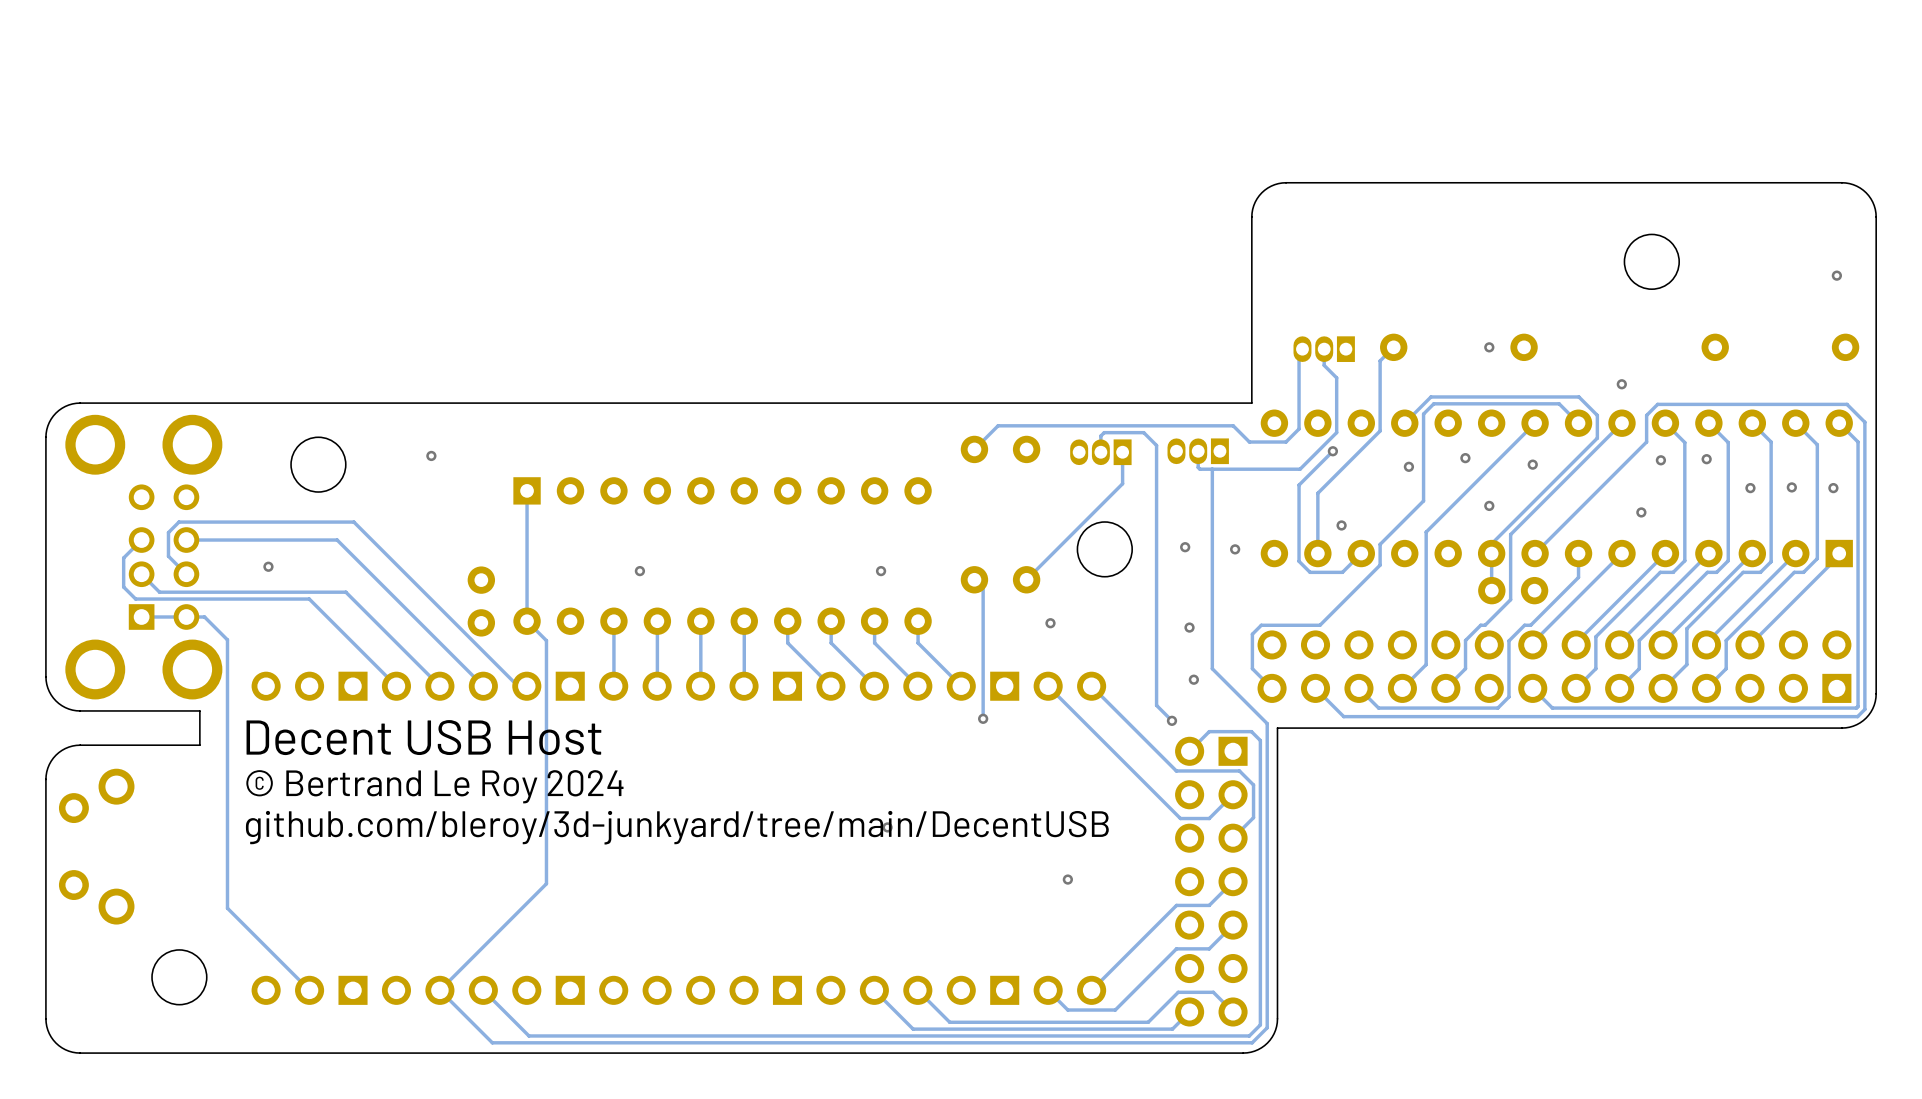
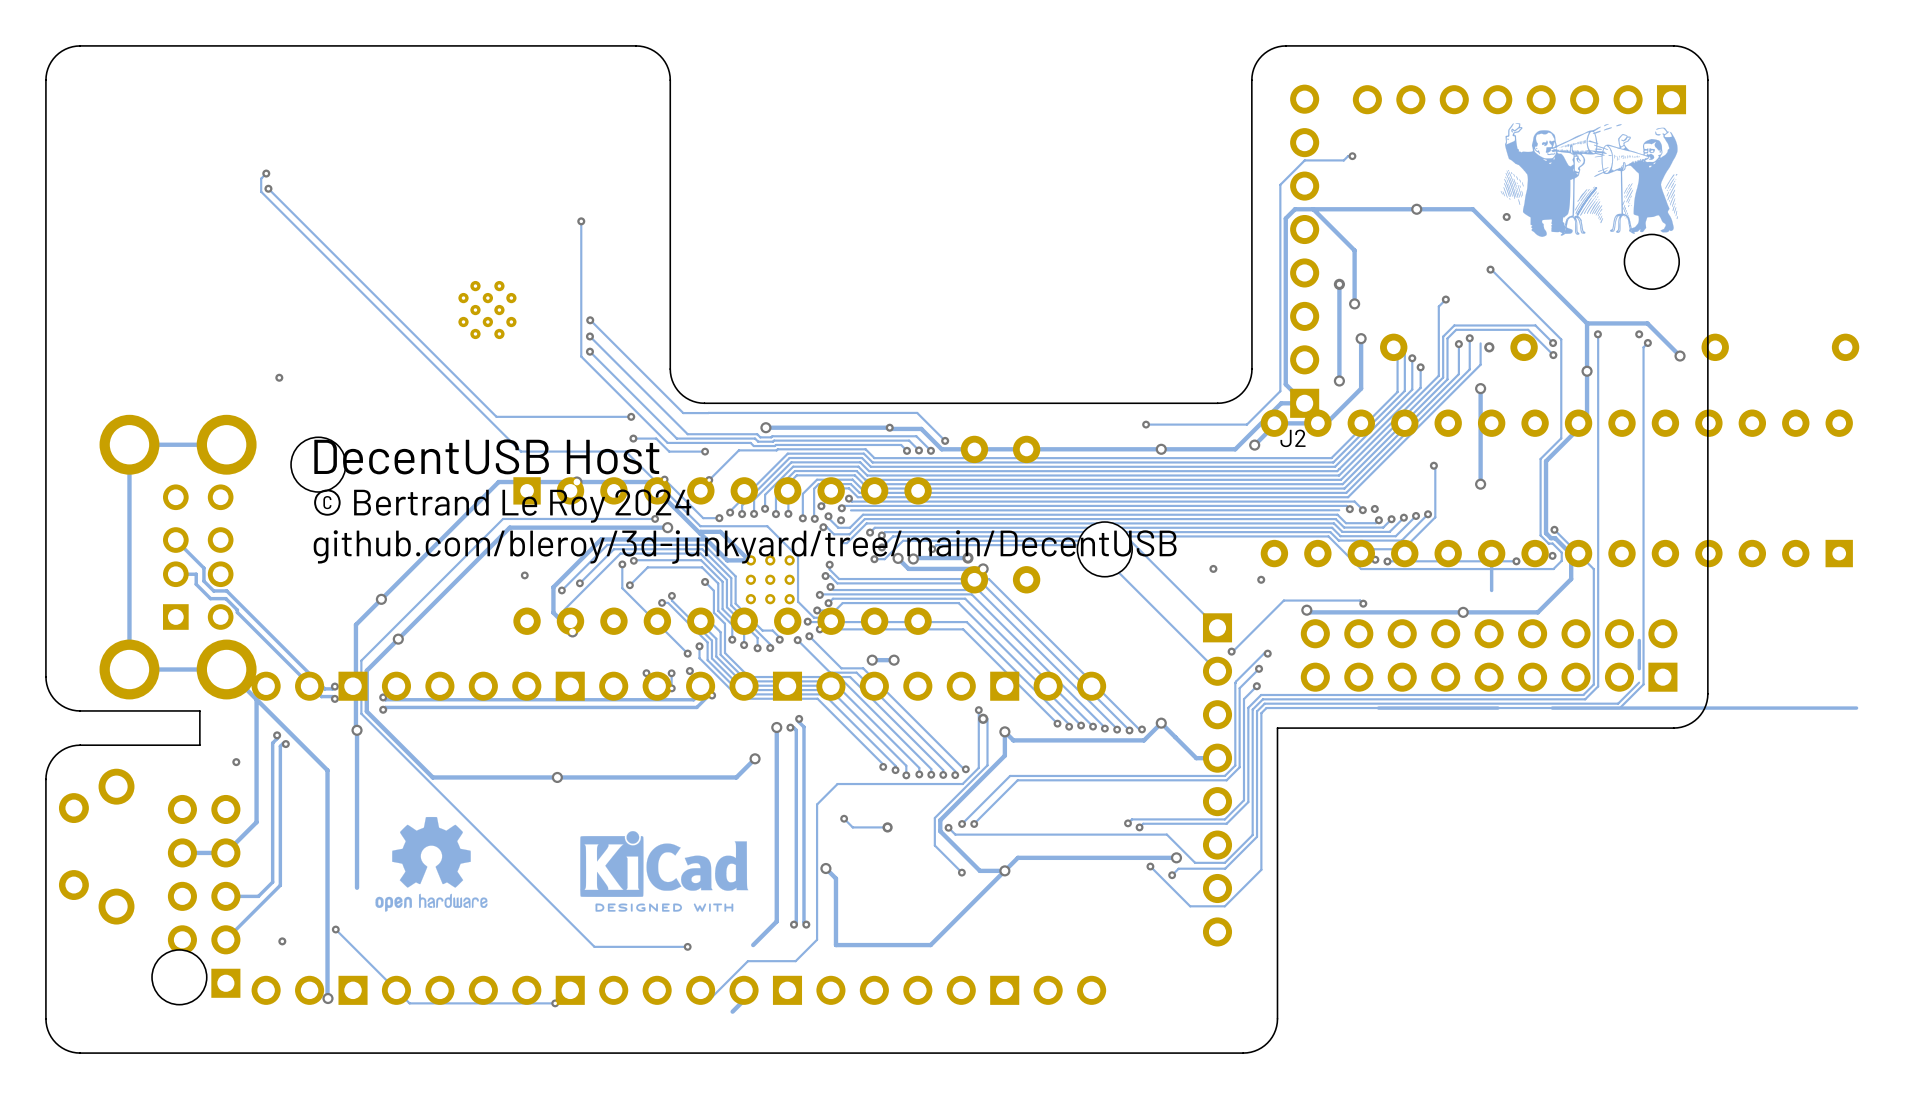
part: none -> (1519, 99)
drawing: none -> [1500, 123, 1678, 237]
track: none -> (1352, 156) (1348, 156) (1343, 160) (1304, 160) (1280, 184) (1280, 391) (1246, 424) (1146, 424)
via: none -> (1352, 156)
track: none -> (266, 173) (261, 178) (261, 191) (520, 451) (625, 451) (700, 526) (767, 526) (798, 556) (798, 601) (814, 617) (838, 617) (841, 614)
via: none -> (266, 173)
track: none -> (268, 188) (496, 416) (631, 416)
via: none -> (268, 188)
track: none -> (1313, 209) (1354, 250) (1354, 303)
via: none -> (1416, 209)
via: none -> (1506, 217)
track: none -> (581, 221) (581, 356) (667, 442) (750, 442) (753, 446) (901, 444) (906, 450)
via: none -> (581, 221)
J2: none -> (1304, 251)
track: none -> (1490, 269) (1561, 339) (1561, 438) (1540, 458) (1540, 535) (1561, 552) (1561, 560) (1553, 569) (1361, 569) (1328, 536) (893, 536) (882, 547)
via: none -> (1490, 269)
via: (1836, 275) -> none
track: none -> (1339, 284) (1339, 381)
via: none -> (1339, 284)
track: none -> (1445, 299) (1438, 306) (1438, 375) (1339, 475) (867, 475) (858, 466) (793, 466) (765, 494) (765, 508)
via: none -> (1445, 299)
via: none -> (1354, 303)
part: none -> (487, 310)
track: none -> (590, 320) (683, 413) (917, 412) (945, 440)
via: none -> (590, 320)
track: none -> (1587, 323) (1587, 420) (1546, 461) (1546, 533) (1551, 538) (1555, 538) (1571, 554) (1571, 579) (1537, 612) (1309, 612) (1306, 610)
track: none -> (1587, 323) (1647, 323) (1680, 356)
track: none -> (1587, 323) (1472, 209) (1295, 209) (1285, 218) (1285, 384) (1304, 403) (1281, 403) (1235, 449) (941, 449) (921, 428) (765, 427)
track: none -> (1597, 334) (1598, 686) (1585, 699) (1262, 699) (1252, 709) (1252, 835) (1224, 862) (1195, 862) (1166, 834) (955, 834) (948, 827)
via: none -> (1597, 334)
via: none -> (1639, 334)
track: none -> (589, 336) (687, 434) (757, 434) (760, 437) (916, 436) (930, 450)
via: none -> (589, 336)
track: none -> (1397, 337) (1397, 392) (1331, 458) (874, 458) (865, 449) (738, 450) (709, 480)
track: none -> (1361, 338) (1361, 388) (1326, 423) (1276, 423) (1254, 445)
via: none -> (1361, 338)
track: none -> (1469, 338) (1469, 369) (1346, 492) (859, 492) (850, 484) (818, 484) (814, 488) (814, 518)
via: none -> (1469, 338)
track: none -> (1647, 342) (1643, 347) (1643, 684) (1619, 708) (1266, 708) (1261, 713) (1261, 869) (1224, 906) (1190, 906) (1150, 866)
via: none -> (1647, 342)
track: none -> (1480, 343) (1480, 364) (1348, 497) (857, 497) (849, 488) (839, 488) (821, 506)
track: none -> (1553, 343) (1535, 325) (1454, 325) (1443, 336) (1443, 377) (1340, 479) (865, 479) (856, 471) (795, 471) (775, 490) (775, 514)
via: none -> (1553, 343)
track: none -> (1458, 344) (1458, 374) (1344, 488) (861, 488) (852, 479) (817, 479) (802, 493) (802, 518)
via: none -> (1458, 344)
track: (1393, 347) (1380, 360) (1380, 430) (1317, 493) (1317, 553) -> none
track: none -> (1404, 348) (1404, 390) (1333, 462) (872, 462) (863, 453) (787, 453) (730, 512)
track: (1324, 349) (1324, 365) (1336, 377) (1336, 432) (1300, 469) (1199, 469) (1198, 467) (1198, 451) -> none
part: (1324, 349) -> none
track: none -> (589, 351) (676, 438) (755, 438) (758, 441) (909, 440) (918, 450)
via: none -> (589, 351)
track: (1299, 352) (1299, 428) (1286, 442) (1249, 442) (1233, 425) (998, 425) (974, 449) -> none
track: none -> (1553, 355) (1528, 329) (1456, 329) (1447, 338) (1447, 379) (1342, 484) (863, 484) (854, 475) (796, 475) (788, 483) (788, 513)
via: none -> (1553, 355)
via: none -> (1680, 356)
track: none -> (1412, 358) (1412, 389) (1335, 466) (870, 466) (862, 458) (789, 458) (742, 505) (742, 514)
via: none -> (1412, 358)
track: none -> (1420, 367) (1420, 387) (1337, 471) (869, 471) (860, 462) (791, 462) (754, 499) (754, 513)
via: none -> (1420, 367)
via: none -> (1587, 371)
via: none -> (279, 377)
via: none -> (1339, 381)
via: (1621, 384) -> none
track: none -> (1480, 388) (1480, 484)
via: none -> (1480, 388)
via: none -> (631, 416)
track: (1404, 423) (1430, 396) (1578, 396) (1597, 415) (1597, 438) (1491, 543) -> none
track: (1535, 423) (1426, 532) (1426, 664) (1402, 688) -> none
track: (1578, 423) (1559, 403) (1433, 403) (1423, 414) (1423, 500) (1380, 544) (1380, 565) (1319, 625) (1261, 625) (1252, 634) (1252, 668) (1272, 688) -> none
track: (1621, 423) (1510, 534) (1510, 599) (1485, 625) (1480, 625) (1465, 640) (1465, 668) (1445, 688) -> none
track: (1665, 423) (1684, 442) (1684, 560) (1673, 572) (1660, 572) (1595, 636) (1595, 668) (1576, 688) -> none
track: (1708, 423) (1728, 442) (1728, 560) (1716, 572) (1707, 572) (1639, 640) -> none
track: (1752, 423) (1771, 442) (1771, 561) (1760, 572) (1743, 572) (1686, 628) (1686, 664) (1663, 688) -> none
track: (1795, 423) (1817, 444) (1817, 558) (1803, 572) (1794, 572) (1726, 640) (1726, 668) (1706, 688) -> none
track: (1839, 423) (1858, 442) (1856, 708) -> none
via: none -> (1146, 424)
via: none -> (765, 427)
via: none -> (889, 427)
board edge: (45, 437) (47, 425) (55, 413) (68, 405) (80, 403) (1251, 403) (1252, 213) (1259, 195) (1274, 184) (1286, 182) (1841, 182) (1853, 184) (1863, 190) (1870, 198) (1876, 216) (1876, 693) (1874, 705) (1863, 720) (1845, 727) (1673, 728) -> (45, 437) (46, 76) (53, 58) (61, 51) (72, 46) (636, 45) (654, 51) (665, 61) (670, 80) (670, 372) (673, 383) (680, 393) (689, 399) (704, 403) (1217, 403) (1229, 401) (1244, 390) (1251, 372) (1251, 80) (1255, 65) (1264, 53) (1274, 47) (1286, 45) (1681, 46) (1691, 51) (1700, 58) (1705, 68) (1707, 80) (1707, 693) (1704, 708) (1697, 718) (1684, 726) (1673, 728)
track: none -> (633, 438) (656, 438) (669, 451) (705, 451)
via: none -> (633, 438)
via: none -> (945, 440)
track: none -> (226, 444) (129, 444) (129, 669) (226, 669) (327, 770) (327, 998)
via: none -> (1254, 445)
via: none -> (1161, 449)
via: none -> (906, 450)
via: none -> (918, 450)
via: none -> (930, 450)
via: none -> (705, 451)
part: (1198, 451) -> none
track: (1332, 451) (1299, 485) (1299, 561) (1310, 572) (1342, 572) (1361, 553) -> none
via: (1332, 451) -> none
track: (1100, 452) (1100, 435) (1104, 432) (1143, 432) (1156, 445) (1156, 705) (1171, 720) -> none
part: (1100, 452) -> none
track: (1122, 452) (1122, 483) (1026, 579) -> none
via: (431, 455) -> none
text: none -> DecentUSB Host (486, 456)
via: (1465, 458) -> none
via: (1706, 459) -> none
via: (1660, 460) -> none
via: (1532, 464) -> none
track: none -> (1433, 465) (1435, 517) (1403, 549) (1374, 549) (1363, 560)
via: none -> (1433, 465)
via: (1408, 466) -> none
track: (1212, 469) (1212, 668) (1267, 723) (1267, 1027) (1252, 1042) (492, 1042) (439, 990) (546, 883) (546, 640) (527, 621) (527, 490) -> none
track: none -> (664, 479) (703, 518) (719, 518)
via: none -> (664, 479)
via: none -> (709, 480)
via: none -> (576, 482)
via: none -> (1480, 484)
via: (1791, 487) -> none
via: (1750, 488) -> none
via: (1833, 488) -> none
track: none -> (848, 498) (851, 501) (1354, 501) (1362, 510)
via: none -> (848, 498)
via: (1489, 505) -> none
via: none -> (821, 506)
via: none -> (765, 508)
track: none -> (841, 508) (844, 505) (1346, 505) (1349, 509)
via: none -> (841, 508)
via: none -> (1374, 508)
via: none -> (1349, 509)
track: none -> (1339, 510) (850, 510)
via: none -> (1362, 510)
via: none -> (730, 512)
via: (1641, 512) -> none
via: none -> (754, 513)
via: none -> (788, 513)
via: none -> (742, 514)
via: none -> (775, 514)
track: none -> (1428, 514) (1401, 540) (1338, 540) (1330, 532) (885, 532) (881, 535)
via: none -> (1428, 514)
track: none -> (1416, 515) (1395, 536) (1340, 536) (1332, 527) (874, 527) (870, 532)
via: none -> (1416, 515)
track: none -> (828, 516) (838, 527) (850, 527) (863, 514) (1337, 514) (1345, 523) (1375, 523) (1378, 520)
via: none -> (828, 516)
track: none -> (1403, 517) (1389, 531) (1342, 531) (1333, 523) (866, 523) (846, 543) (843, 543)
via: none -> (1403, 517)
track: none -> (655, 518) (503, 518) (361, 660) (361, 713) (594, 946) (687, 946)
via: none -> (655, 518)
via: none -> (719, 518)
via: none -> (802, 518)
via: none -> (814, 518)
track: none -> (1391, 519) (1383, 527) (1344, 527) (1335, 519) (864, 519) (849, 534) (833, 534) (826, 527) (823, 527)
via: none -> (1391, 519)
via: none -> (841, 520)
via: none -> (1378, 520)
via: (1341, 525) -> none
track: none -> (667, 527) (509, 527) (366, 670) (366, 711) (432, 777) (736, 777) (755, 758)
via: none -> (667, 527)
via: none -> (823, 527)
track: none -> (1554, 529) (1593, 569) (1593, 684) (1583, 694) (1261, 694) (1248, 707) (1248, 802) (1226, 823) (1143, 823) (1139, 827)
via: none -> (1554, 529)
via: none -> (870, 532)
track: none -> (700, 533) (648, 482) (498, 482) (355, 624) (357, 887)
track: none -> (700, 533) (727, 560) (750, 560)
track: none -> (700, 533) (700, 531) (720, 531) (749, 560)
via: none -> (881, 535)
track: none -> (706, 539) (601, 539) (553, 587) (553, 612) (572, 631)
track: (141, 540) (123, 557) (123, 587) (135, 599) (309, 599) (396, 686) -> none
track: none -> (175, 540) (203, 568) (203, 581) (213, 590) (226, 590) (324, 688) (332, 688) (334, 686)
track: (186, 540) (337, 540) (483, 686) -> none
via: none -> (882, 547)
via: (1185, 547) -> none
track: none -> (932, 549) (936, 545) (1091, 545) (1217, 671)
via: none -> (932, 549)
via: (1235, 549) -> none
track: (1535, 553) (1646, 442) (1646, 415) (1657, 404) (1847, 404) (1864, 422) (1864, 709) (1857, 716) (1343, 716) (1315, 688) -> none
track: (1578, 553) (1578, 577) (1530, 625) (1524, 625) (1508, 640) (1508, 696) (1497, 708) -> none
track: (1621, 553) (1532, 642) -> none
track: (1665, 553) (1576, 642) -> none
track: (1708, 553) (1619, 642) -> none
track: (1752, 553) (1663, 642) -> none
track: (1795, 553) (1706, 642) -> none
via: none -> (1552, 555)
track: (1839, 555) (1749, 644) -> none
part position: (143, 557) -> (178, 557)
track: none -> (898, 558) (908, 568) (983, 568)
via: none -> (898, 558)
via: none -> (913, 558)
track: none -> (967, 558) (913, 558)
via: none -> (967, 558)
track: none -> (874, 559) (884, 559) (903, 540) (1130, 540) (1217, 627)
via: none -> (874, 559)
via: none -> (1375, 559)
track: none -> (633, 560) (701, 560) (722, 581) (722, 609) (744, 630) (744, 645)
via: none -> (633, 560)
via: none -> (1387, 561)
track: none -> (1516, 561) (1387, 561)
via: none -> (1516, 561)
track: none -> (622, 564) (622, 588) (687, 653)
via: none -> (622, 564)
track: none -> (829, 564) (829, 569) (839, 579) (988, 579) (1139, 729) (1142, 729)
via: none -> (829, 564)
via: (268, 566) -> none
via: none -> (983, 568)
via: none -> (1213, 568)
via: (639, 571) -> none
via: (881, 571) -> none
track: (141, 574) (159, 592) (345, 592) (439, 686) -> none
track: none -> (175, 574) (196, 574) (196, 584) (210, 598) (225, 598) (321, 696) (332, 696) (334, 698)
track: (186, 574) (168, 556) (168, 532) (179, 522) (353, 522) (518, 686) -> none
via: none -> (524, 575)
track: none -> (825, 576) (829, 576) (837, 583) (982, 583) (1129, 730)
via: none -> (825, 576)
part: none -> (770, 579)
track: (983, 579) (983, 718) -> none
via: none -> (1261, 579)
track: none -> (705, 581) (713, 590) (713, 612) (724, 623) (724, 652) (749, 677) (850, 677) (943, 770) (943, 774)
via: none -> (705, 581)
track: none -> (579, 583) (613, 549) (702, 549) (731, 578) (731, 605) (770, 644) (770, 648)
via: none -> (579, 583)
track: none -> (629, 585) (647, 567) (702, 567) (718, 583) (718, 610) (732, 624) (732, 639)
via: none -> (629, 585)
track: none -> (830, 586) (833, 590) (978, 590) (1117, 729)
via: none -> (830, 586)
track: none -> (561, 590) (607, 544) (704, 544) (735, 576) (735, 603) (762, 630) (772, 630) (779, 639)
via: none -> (561, 590)
part: (1513, 590) -> none
track: none -> (819, 594) (971, 594) (1104, 728)
via: none -> (819, 594)
track: none -> (671, 595) (671, 600) (711, 640) (711, 658) (743, 690) (830, 690) (906, 765) (906, 775)
via: none -> (671, 595)
via: none -> (381, 599)
part: (481, 601) -> none
track: none -> (662, 602) (668, 602) (707, 642) (707, 660) (741, 694) (824, 694) (895, 765) (895, 770)
via: none -> (662, 602)
track: none -> (828, 603) (832, 598) (965, 598) (1093, 726)
via: none -> (828, 603)
track: none -> (1363, 603) (1360, 600) (1283, 600) (1231, 651)
via: none -> (1363, 603)
track: none -> (564, 609) (620, 553) (700, 553) (726, 579) (726, 607) (757, 637) (757, 648)
track: none -> (699, 609) (699, 622) (716, 638) (716, 656) (745, 685) (837, 685) (919, 767) (919, 774)
track: none -> (817, 610) (835, 610) (842, 603) (958, 603) (1081, 725)
via: none -> (817, 610)
via: none -> (1306, 610)
via: none -> (1463, 612)
track: (141, 617) (204, 617) (227, 639) (227, 908) (309, 990) -> none
track: none -> (707, 618) (720, 632) (720, 654) (747, 681) (843, 681) (931, 769) (931, 774)
track: (613, 621) (613, 685) -> none
track: (657, 621) (657, 685) -> none
track: (700, 621) (700, 685) -> none
track: (744, 621) (744, 685) -> none
track: (787, 621) (787, 643) (830, 686) -> none
track: none -> (807, 621) (966, 622) (1069, 724) (1069, 726)
via: none -> (807, 621)
track: (831, 621) (831, 643) (874, 686) -> none
track: (874, 621) (874, 643) (917, 686) -> none
track: (918, 621) (918, 643) (961, 686) -> none
via: (1050, 623) -> none
via: (1189, 627) -> none
track: none -> (819, 629) (963, 629) (1057, 723)
via: none -> (819, 629)
via: none -> (572, 631)
track: none -> (809, 636) (841, 668) (863, 668) (965, 769)
via: none -> (809, 636)
via: none -> (398, 639)
via: none -> (732, 639)
via: none -> (779, 639)
track: none -> (797, 640) (830, 672) (856, 672) (955, 771) (955, 775)
via: none -> (797, 640)
via: none -> (744, 645)
track: none -> (699, 646) (699, 658) (740, 698) (817, 698) (883, 764) (883, 766)
via: none -> (699, 646)
via: none -> (757, 648)
via: none -> (770, 648)
via: none -> (1231, 651)
via: none -> (687, 653)
track: none -> (1267, 653) (1263, 653) (1235, 683) (1235, 765) (1224, 775) (1010, 775) (962, 824)
via: none -> (1267, 653)
part: none -> (1489, 655)
via: none -> (872, 660)
track: none -> (894, 660) (872, 660)
via: none -> (894, 660)
part: (1554, 666) -> none
track: none -> (1259, 668) (1239, 688) (1239, 767) (1226, 780) (1017, 780) (974, 823)
via: none -> (1259, 668)
track: (1639, 668) (1619, 688) -> none
via: none -> (689, 671)
via: none -> (646, 673)
track: none -> (671, 673) (671, 688)
via: none -> (671, 673)
via: (1193, 679) -> none
track: none -> (1639, 682) (1618, 703) (1264, 703) (1257, 711) (1257, 836) (1225, 868) (1178, 868) (1172, 875)
via: none -> (334, 686)
track: none -> (703, 686) (703, 690) (693, 699) (385, 699) (383, 697)
track: (1048, 686) (1180, 818) (1209, 818) (1233, 794) -> none
track: (1091, 686) (1176, 770) (1239, 770) (1253, 785) (1253, 817) (1233, 838) -> none
track: none -> (1256, 686) (1243, 699) (1243, 800) (1224, 819) (1131, 819) (1127, 823)
via: none -> (1256, 686)
via: none -> (671, 688)
track: (1358, 688) (1378, 708) -> none
track: (1532, 688) (1552, 708) -> none
track: none -> (712, 695) (708, 695) (696, 707) (385, 707) (383, 709)
via: none -> (712, 695)
via: none -> (383, 697)
via: none -> (334, 698)
track: none -> (256, 699) (256, 822) (225, 852) (182, 852)
via: none -> (383, 709)
track: none -> (978, 710) (978, 767) (962, 784) (837, 784) (817, 804) (817, 939) (795, 961) (747, 961) (711, 996)
via: none -> (978, 710)
track: none -> (799, 718) (799, 722) (803, 727) (803, 922) (806, 924)
via: none -> (799, 718)
track: none -> (987, 718) (987, 765) (934, 818) (934, 845) (961, 872)
via: (1171, 720) -> none
via: none -> (1057, 723)
via: none -> (1161, 723)
via: none -> (1081, 725)
via: none -> (1069, 726)
via: none -> (1093, 726)
track: none -> (776, 727) (776, 921) (753, 945)
via: none -> (776, 727)
track: none -> (790, 727) (796, 730) (796, 922) (793, 924)
via: none -> (790, 727)
via: none -> (1104, 728)
via: none -> (1117, 729)
via: none -> (1142, 729)
via: none -> (357, 730)
via: none -> (1129, 730)
via: none -> (1004, 731)
track: none -> (277, 735) (277, 738) (272, 743) (272, 882) (258, 896) (225, 896)
via: none -> (277, 735)
text: Decent USB Host (423, 737) -> none
track: none -> (285, 744) (280, 746) (280, 885) (225, 939)
via: none -> (285, 744)
track: (1189, 751) (1209, 731) (1251, 731) (1260, 740) (1260, 1024) (1249, 1035) (528, 1035) (483, 990) -> none
via: none -> (755, 758)
track: none -> (1217, 758) (1196, 758) (1161, 723) (1144, 740) (1013, 740) (1004, 731) (1004, 755) (940, 820) (940, 831) (979, 870) (1004, 870)
via: none -> (236, 762)
via: none -> (883, 766)
via: none -> (965, 769)
via: none -> (895, 770)
via: none -> (919, 774)
via: none -> (931, 774)
via: none -> (943, 774)
via: none -> (906, 775)
via: none -> (955, 775)
via: none -> (557, 777)
part: none -> (1217, 779)
text position: © Bertrand Le Roy 2024 (434, 786) -> © Bertrand Le Roy 2024 (502, 506)
drawing: none -> [375, 816, 488, 912]
track: none -> (844, 818) (852, 827) (887, 827)
via: none -> (844, 818)
via: none -> (1127, 823)
via: none -> (962, 824)
via: none -> (974, 824)
text position: github.com/bleroy/3d-junkyard/tree/main/DecentUSB (677, 827) -> github.com/bleroy/3d-junkyard/tree/main/DecentUSB (745, 547)
via: none -> (948, 827)
via: none -> (1139, 827)
drawing: none -> [580, 831, 749, 912]
track: none -> (1176, 857) (1017, 857) (930, 945) (835, 945) (835, 878) (825, 868)
via: none -> (1176, 857)
via: none -> (1150, 866)
via: none -> (825, 868)
via: none -> (1004, 870)
via: none -> (961, 872)
via: none -> (1172, 875)
via: (1067, 879) -> none
part: (1211, 881) -> none
track: (1233, 881) (1209, 905) (1176, 905) (1091, 990) -> none
part: none -> (204, 896)
via: none -> (793, 924)
via: none -> (806, 924)
track: (1233, 925) (1209, 948) (1176, 948) (1115, 1010) (1067, 1010) (1048, 990) -> none
track: none -> (335, 929) (409, 1003) (555, 1003)
via: none -> (335, 929)
via: none -> (282, 941)
via: none -> (687, 946)
track: (874, 990) (913, 1029) (1172, 1029) (1189, 1011) -> none
track: (917, 990) (949, 1022) (1148, 1022) (1178, 992) (1213, 992) (1233, 1011) -> none
track: none -> (747, 996) (732, 1011)
via: none -> (327, 998)
via: none -> (555, 1003)

